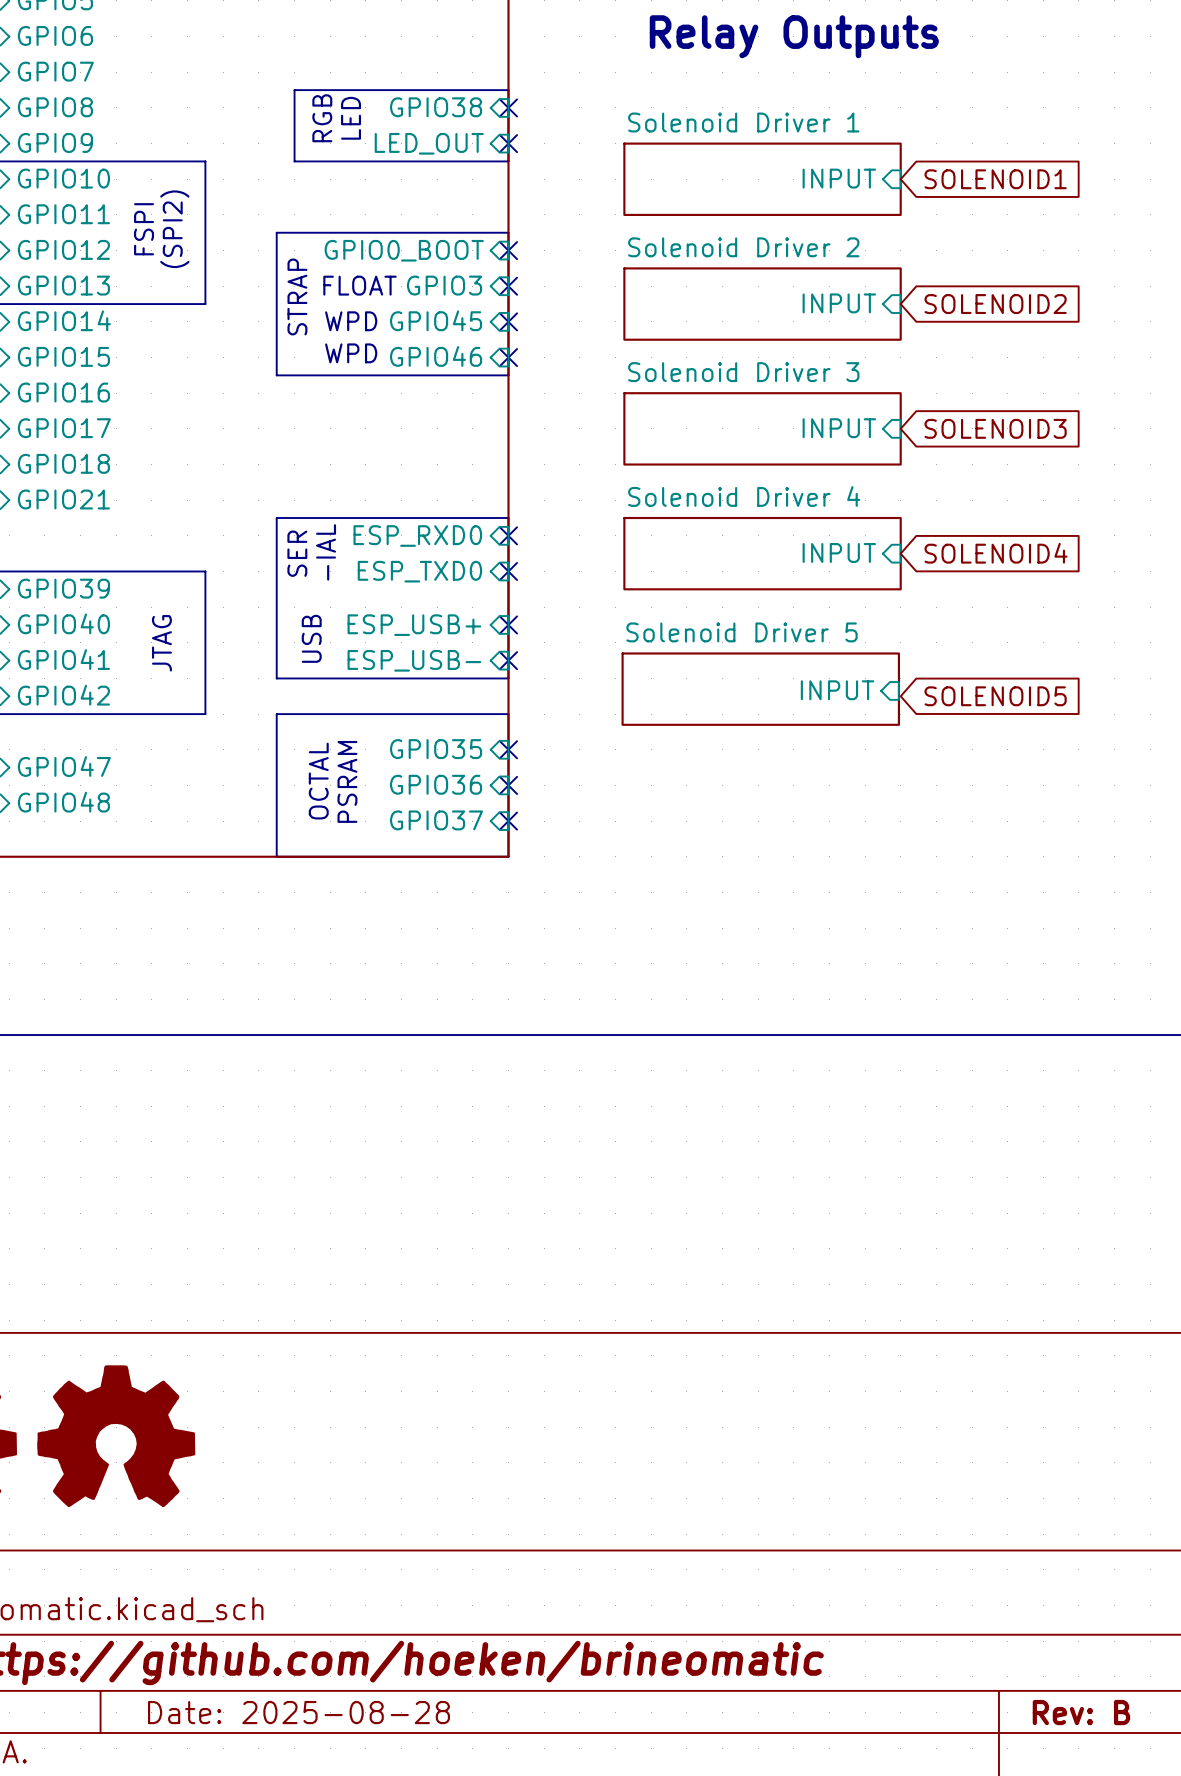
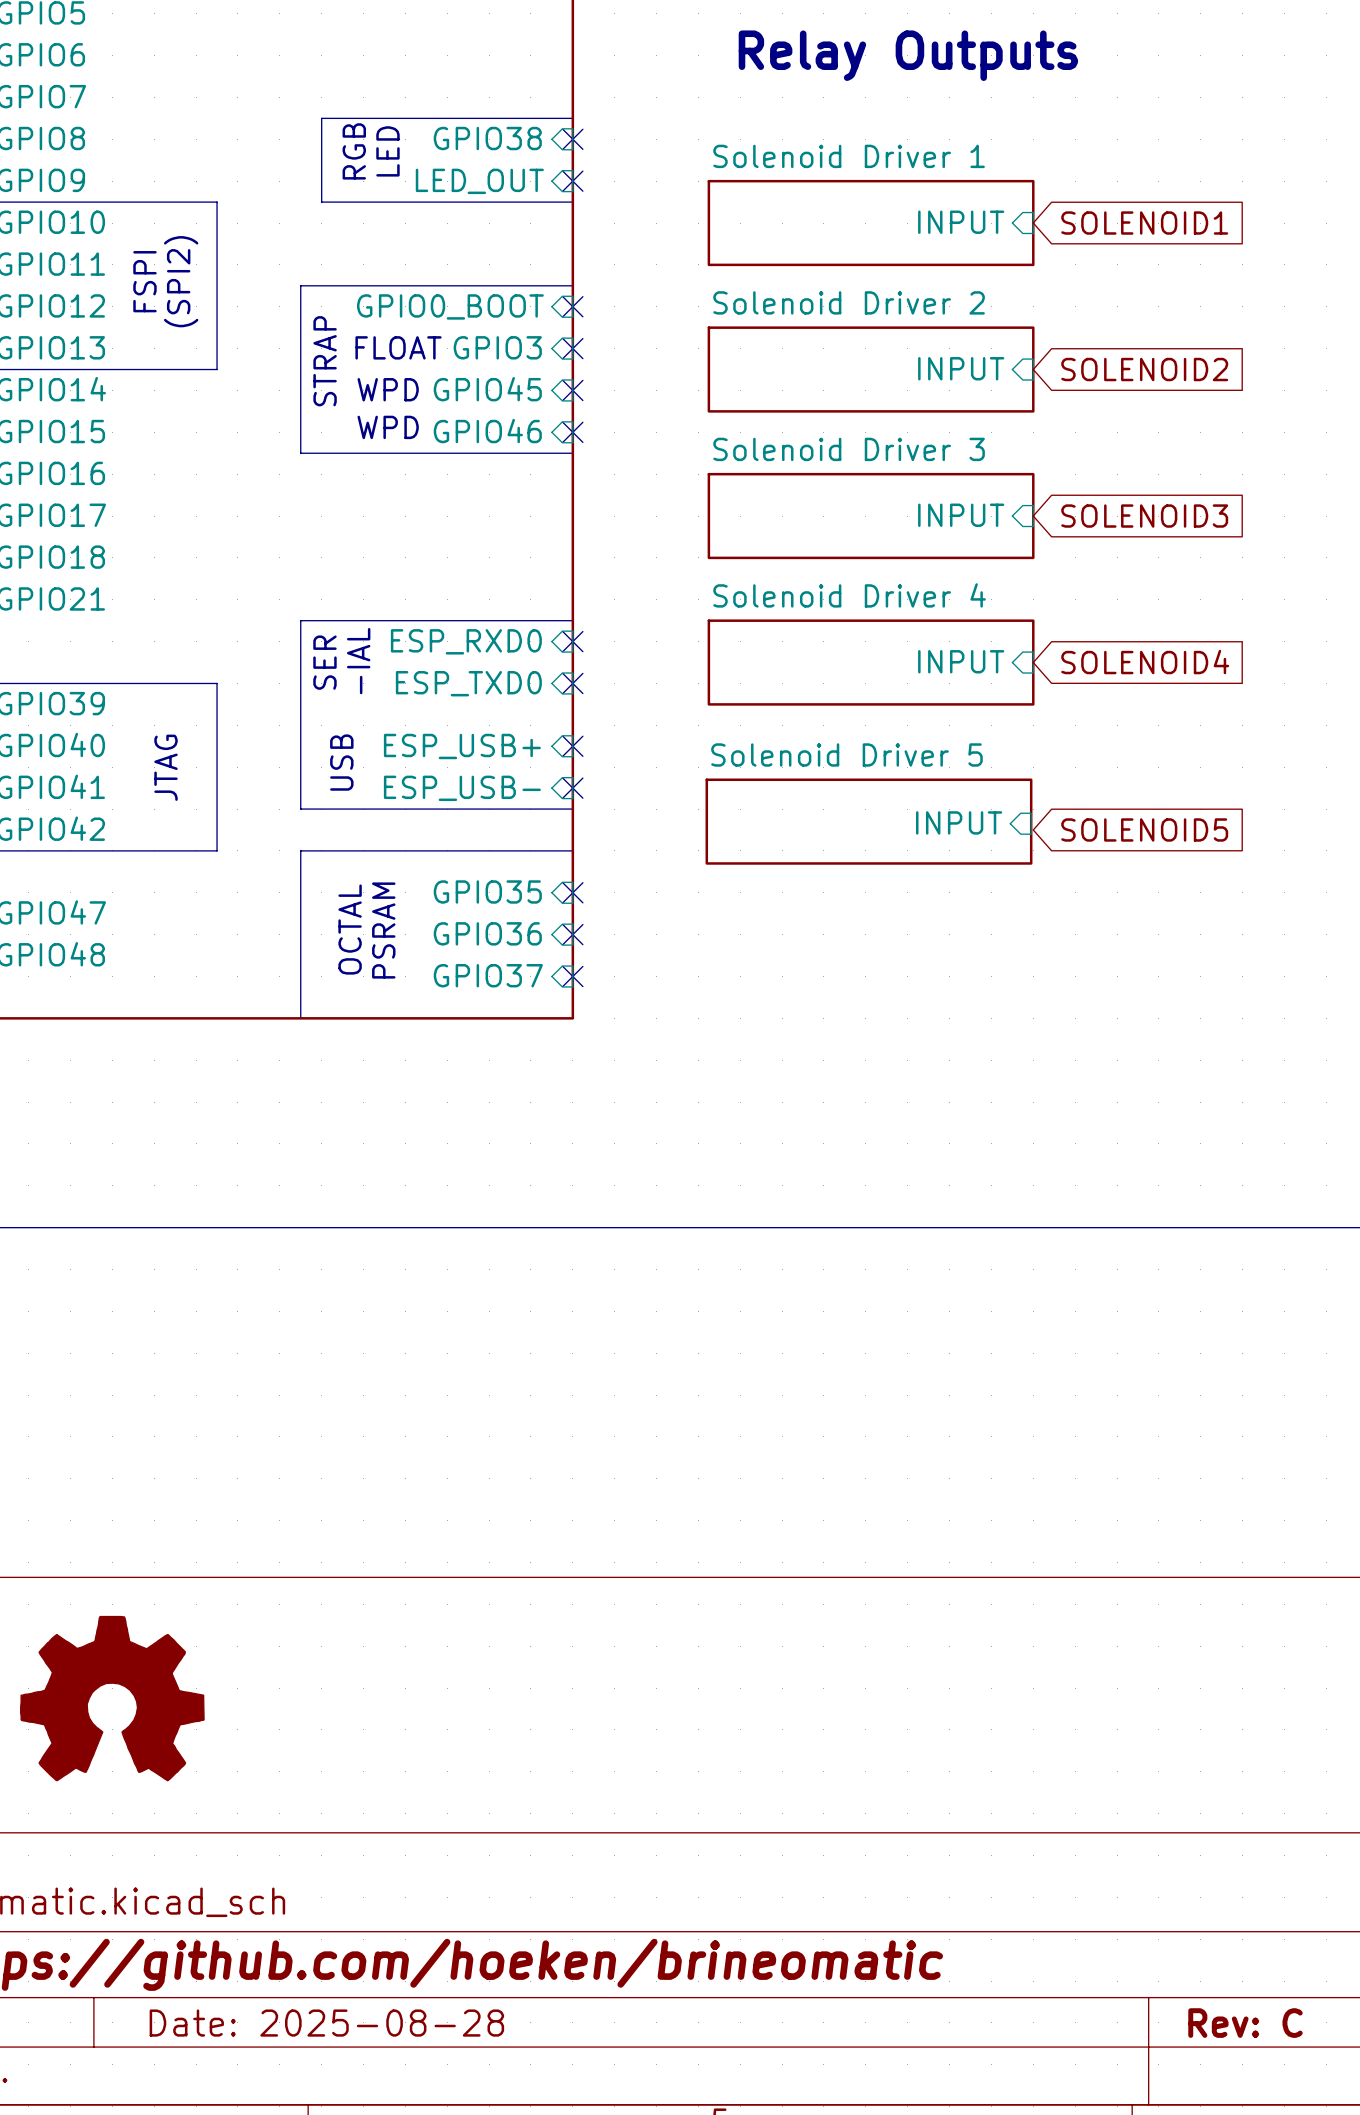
title block: Rev: B (1081, 1712) -> Rev: C (1245, 2023)

